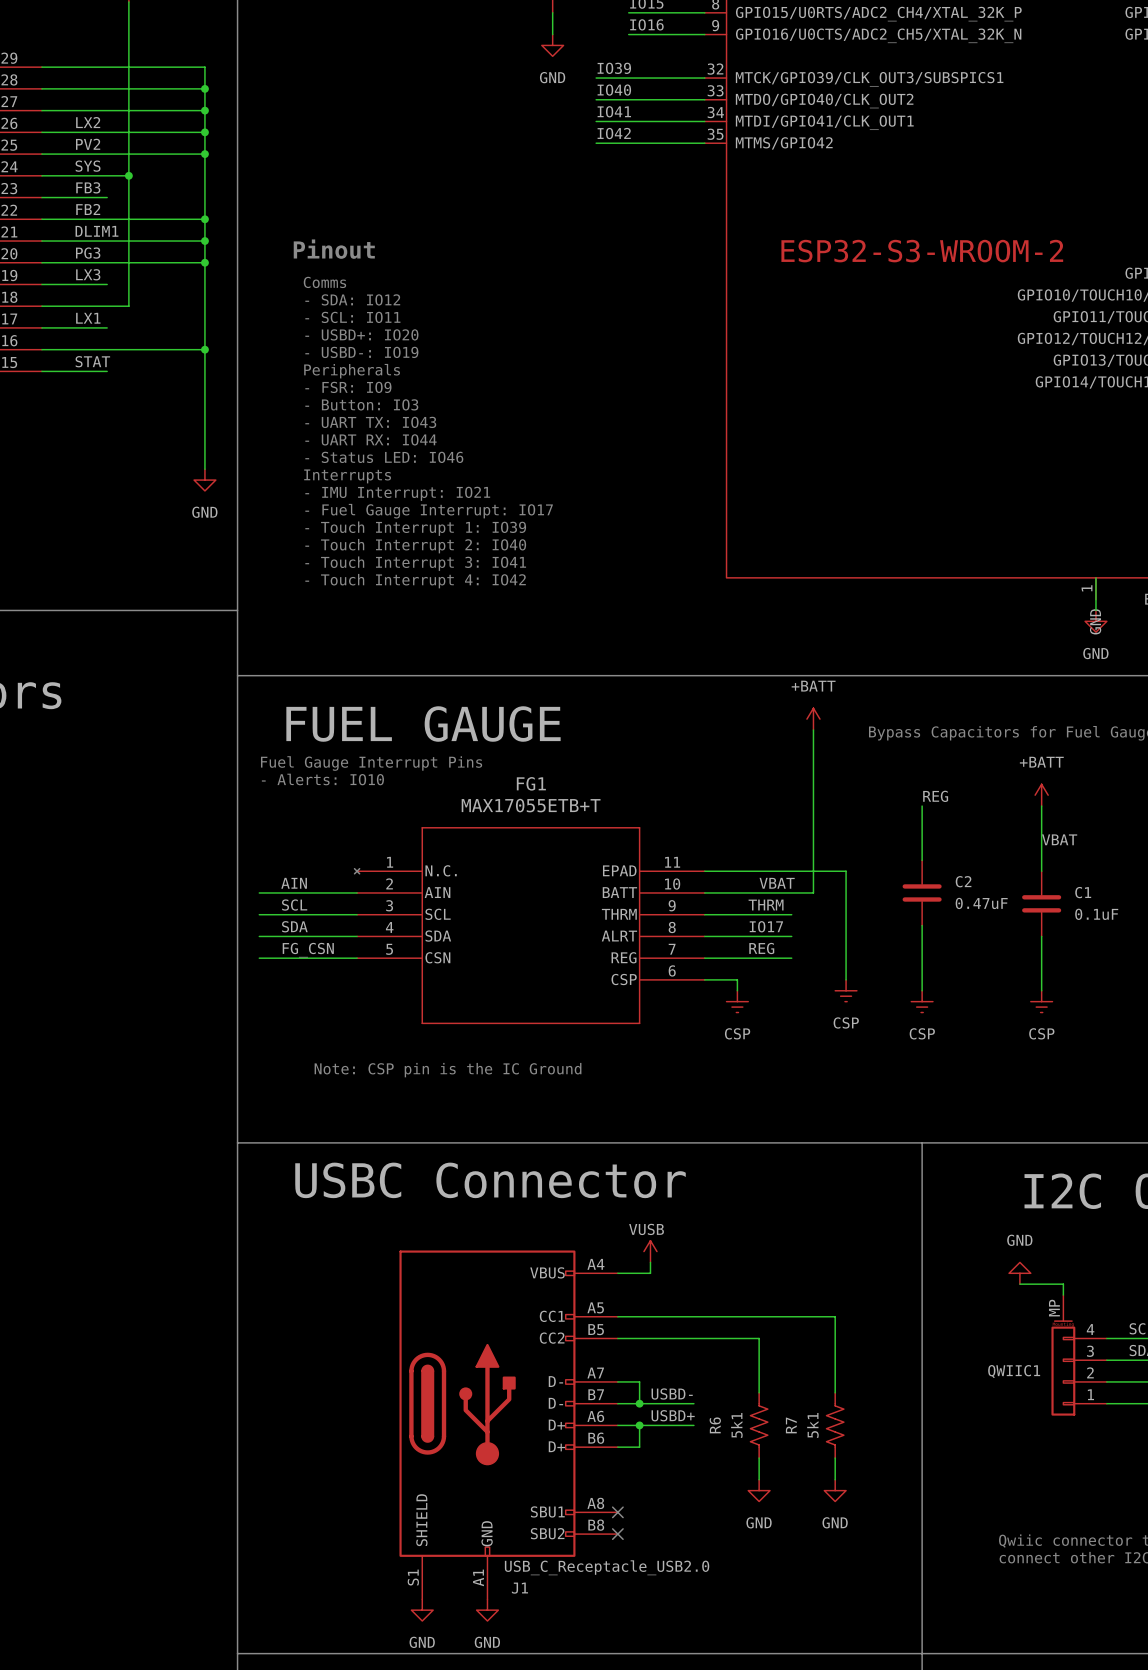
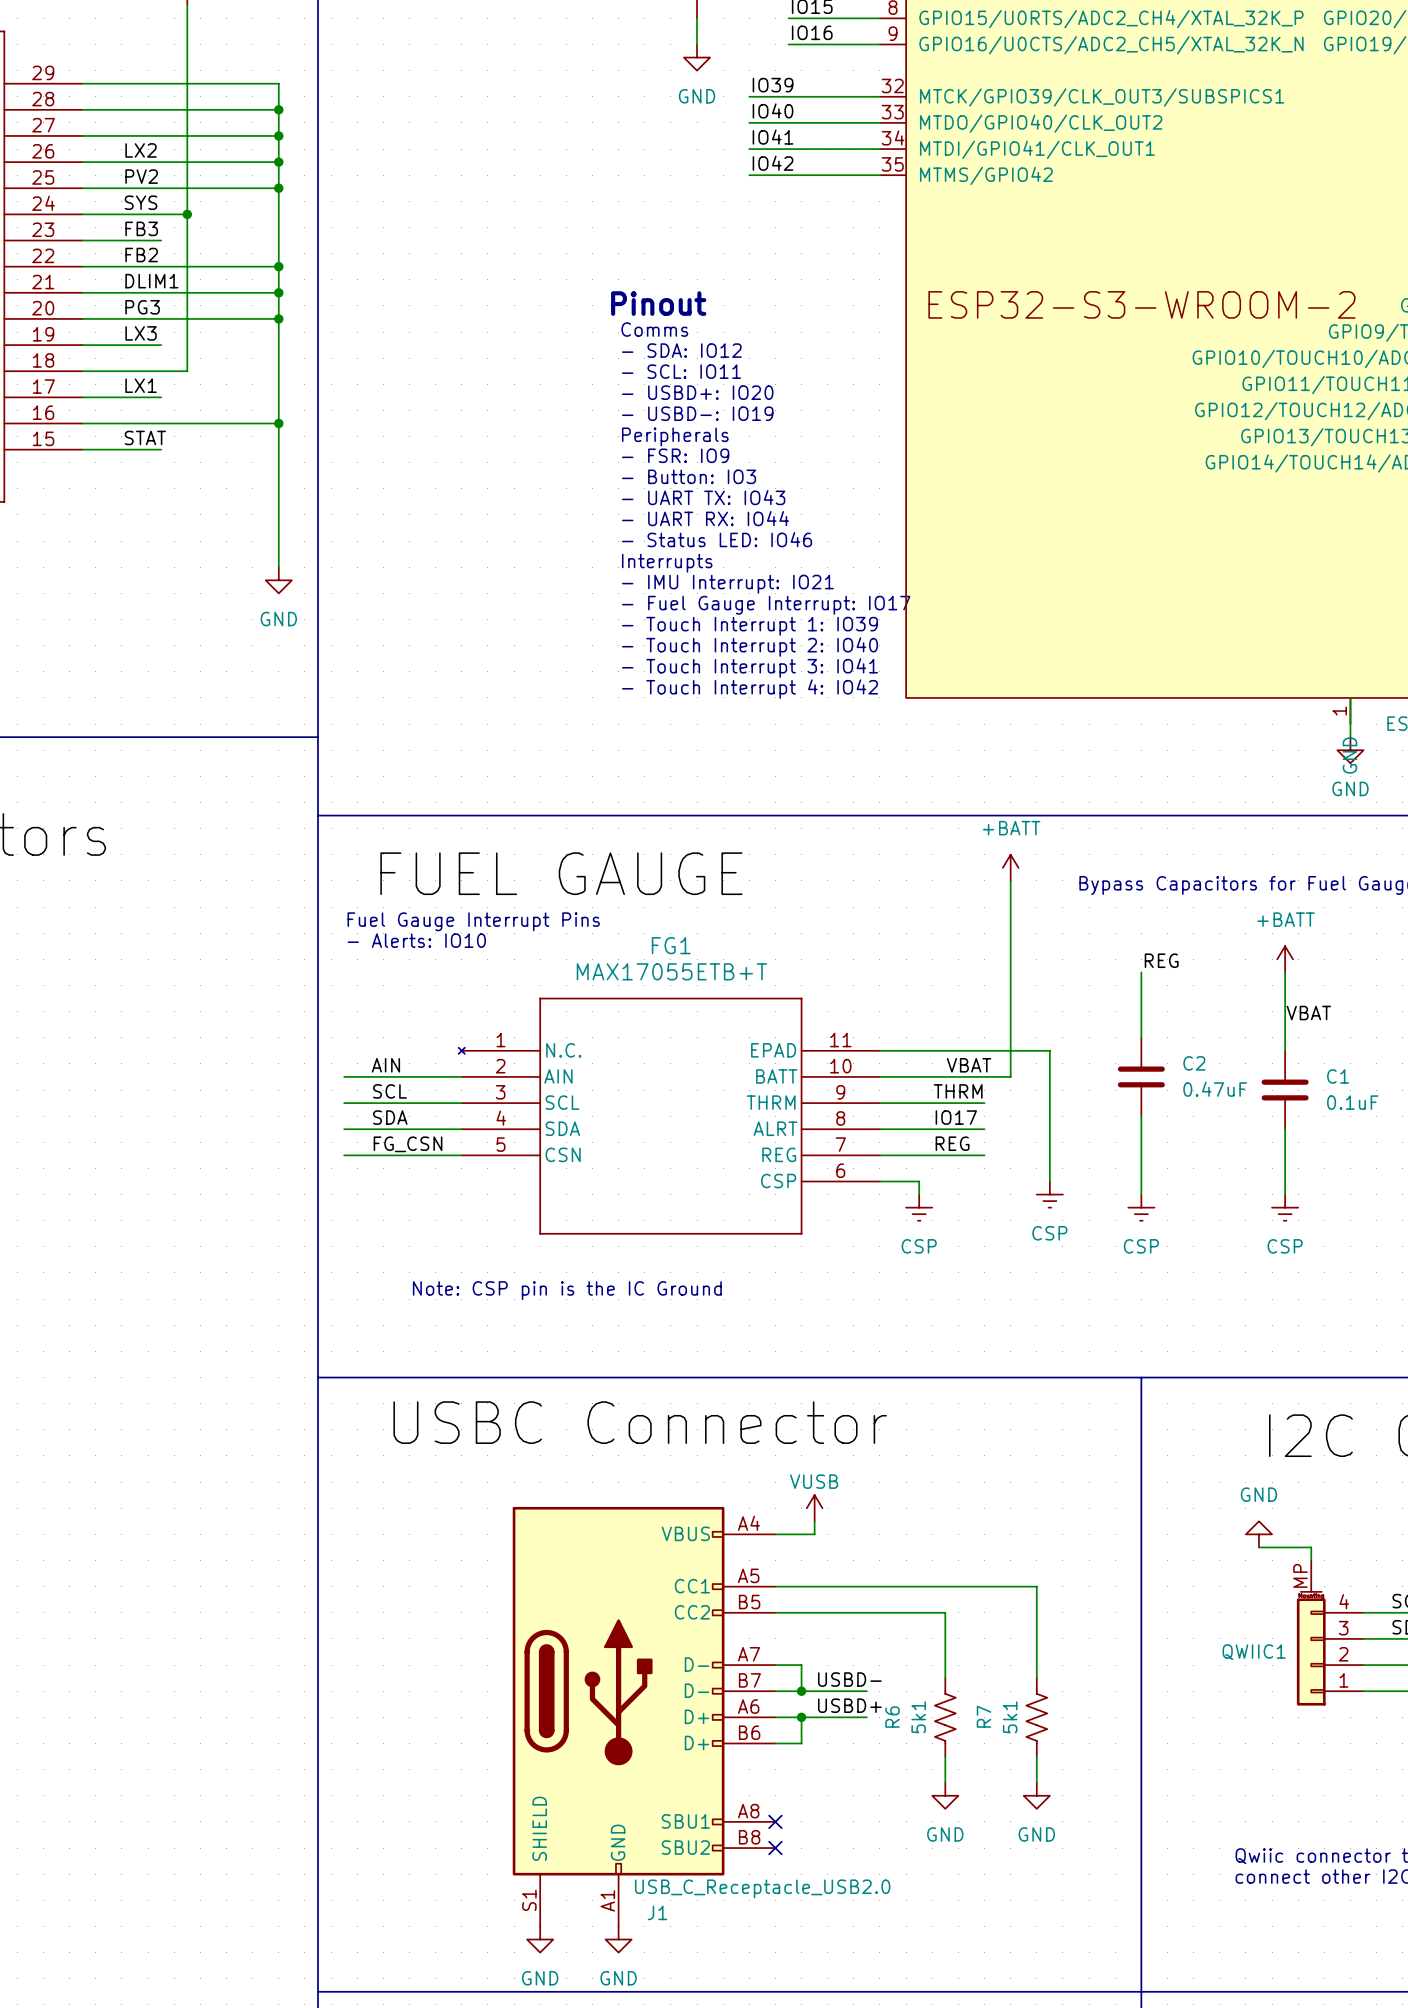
text position: Pinout (334, 249) -> Pinout (658, 303)
text position: Comms (324, 282) -> Comms (654, 329)
text position: - SDA: IO12 (352, 299) -> - SDA: IO12 (681, 350)
text position: - SCL: IO11 (352, 317) -> - SCL: IO11 (681, 371)
text position: - USBD+: IO20 (361, 334) -> - USBD+: IO20 (697, 392)
text position: - USBD-: IO19 (361, 352) -> - USBD-: IO19 (697, 413)
text position: Peripherals (352, 371) -> Peripherals (675, 436)
text position: - FSR: IO9 (348, 387) -> - FSR: IO9 (675, 455)
text position: - Button: IO3 (361, 404) -> - Button: IO3 (689, 476)
text position: - UART TX: IO43 (370, 422) -> - UART TX: IO43 (703, 497)
text position: - UART RX: IO44 (370, 439) -> - UART RX: IO44 (705, 518)
text position: - Status LED: IO46 (384, 457) -> - Status LED: IO46 (717, 539)
text position: Interrupts (347, 476) -> Interrupts (667, 563)
text position: - IMU Interrupt: IO21 (397, 493) -> - IMU Interrupt: IO21 (727, 584)
text position: - Fuel Gauge Interrupt: IO17 (429, 511) -> - Fuel Gauge Interrupt: IO17 (766, 605)
text position: - Touch Interrupt 1: IO39 (415, 528) -> - Touch Interrupt 1: IO39 (750, 626)
text position: - Touch Interrupt 2: IO40 (415, 546) -> - Touch Interrupt 2: IO40 (750, 647)
text position: - Touch Interrupt 3: IO41 (415, 563) -> - Touch Interrupt 3: IO41 (750, 668)
text position: - Touch Interrupt 4: IO42 (415, 581) -> - Touch Interrupt 4: IO42 (750, 689)

